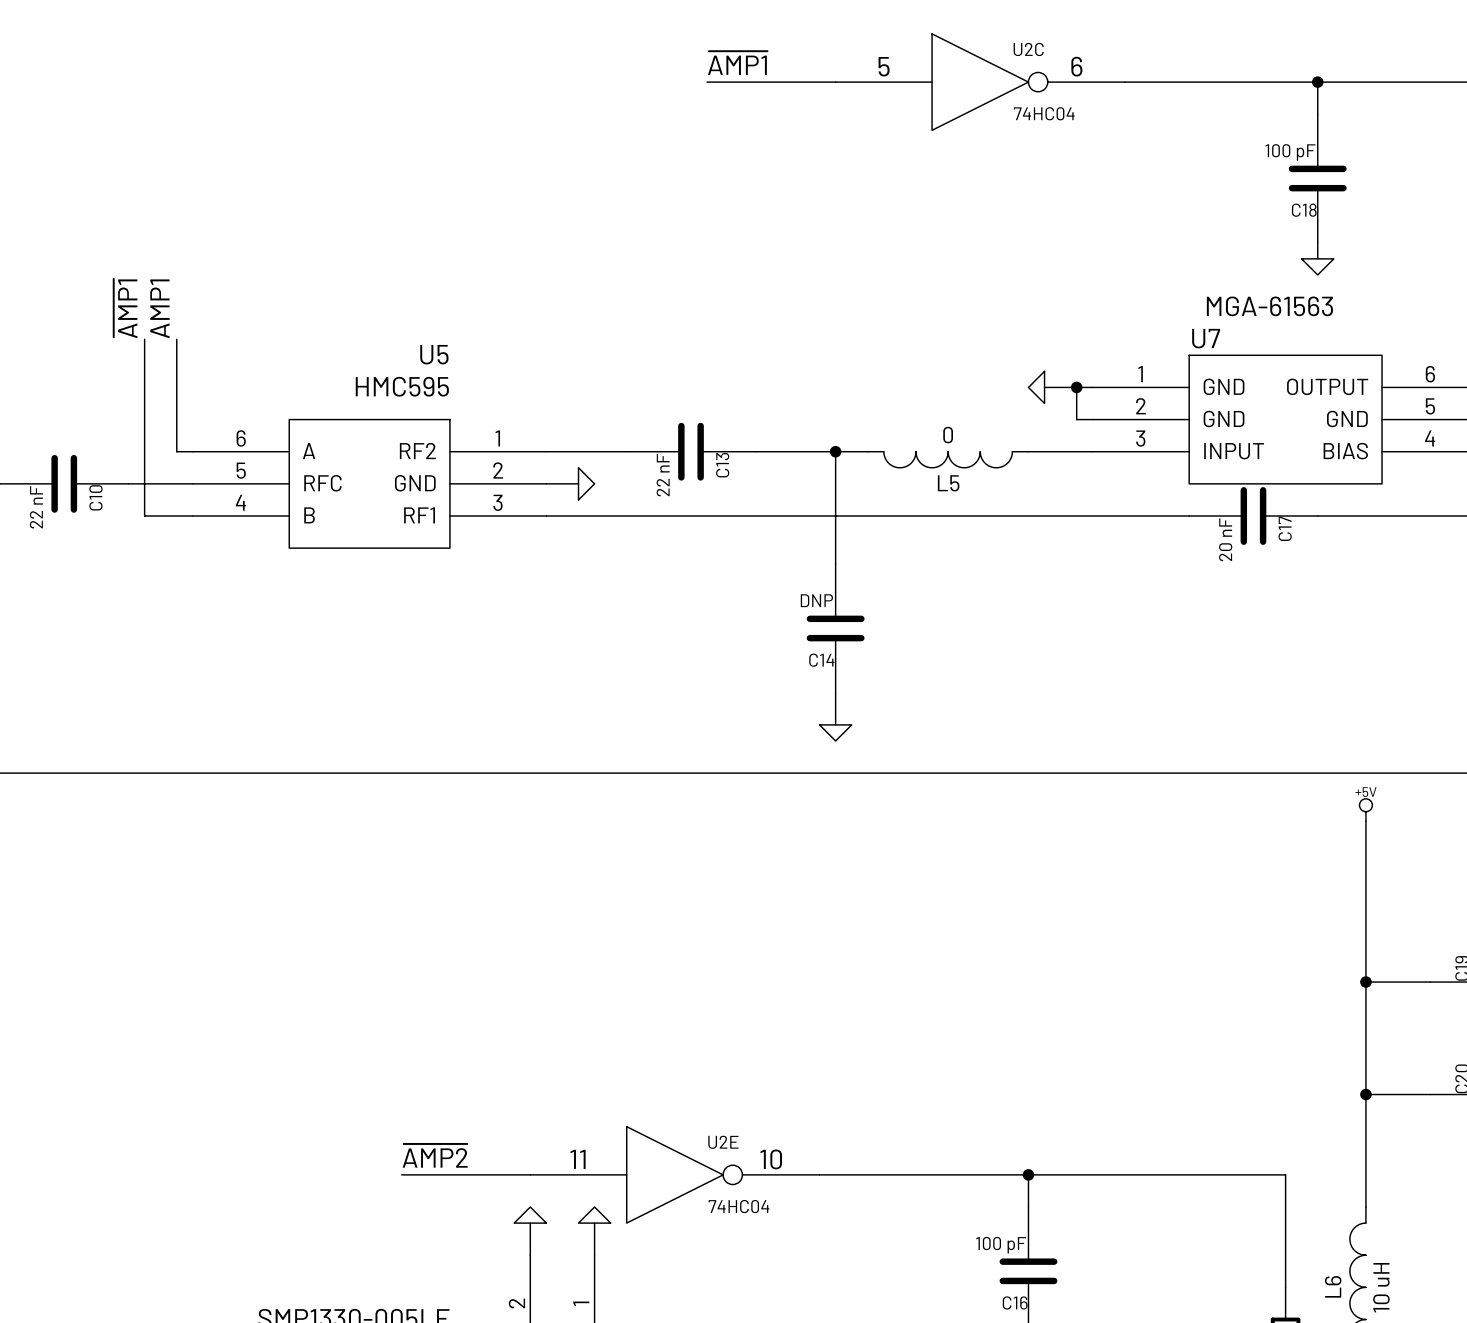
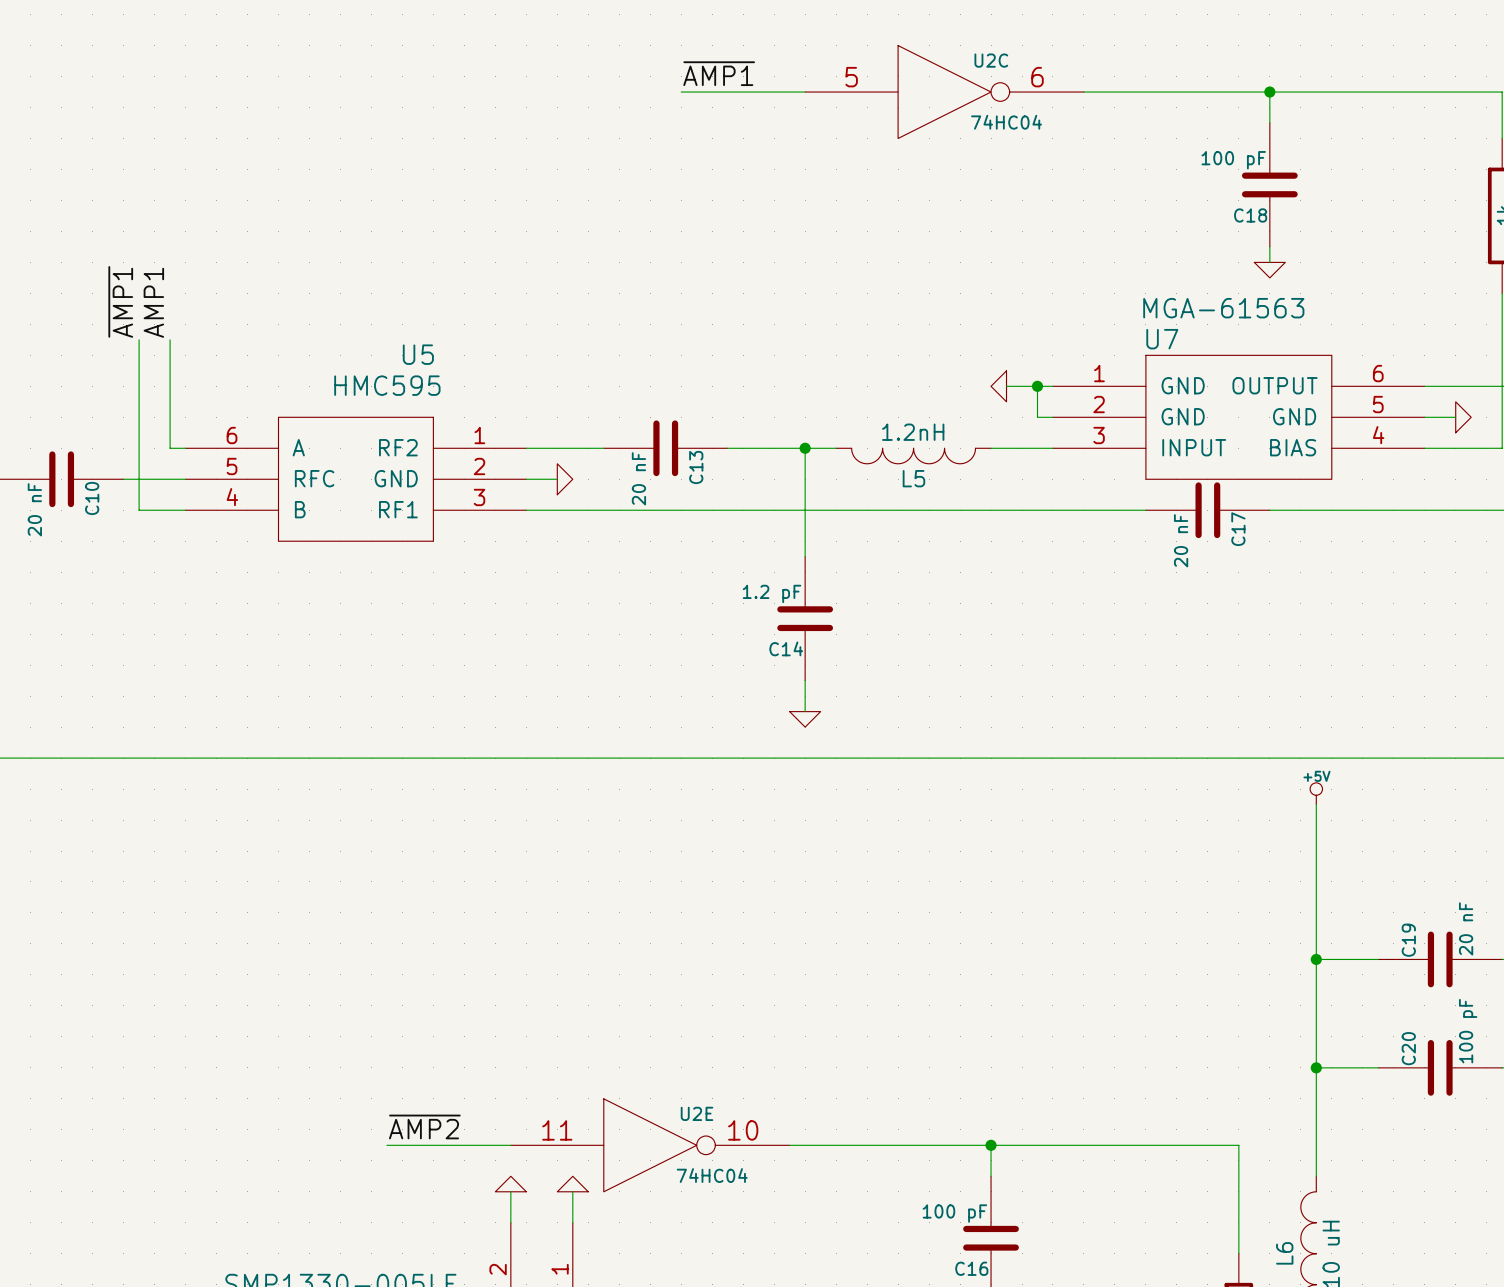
L5 value: 0 (948, 435) -> 1.2nH (913, 432)
C13 value: 22 nF (663, 475) -> 20 nF (638, 478)
C10 value: 22 nF (36, 507) -> 20 nF (34, 509)
C14 value: DNP (816, 600) -> 1.2 pF (771, 593)

